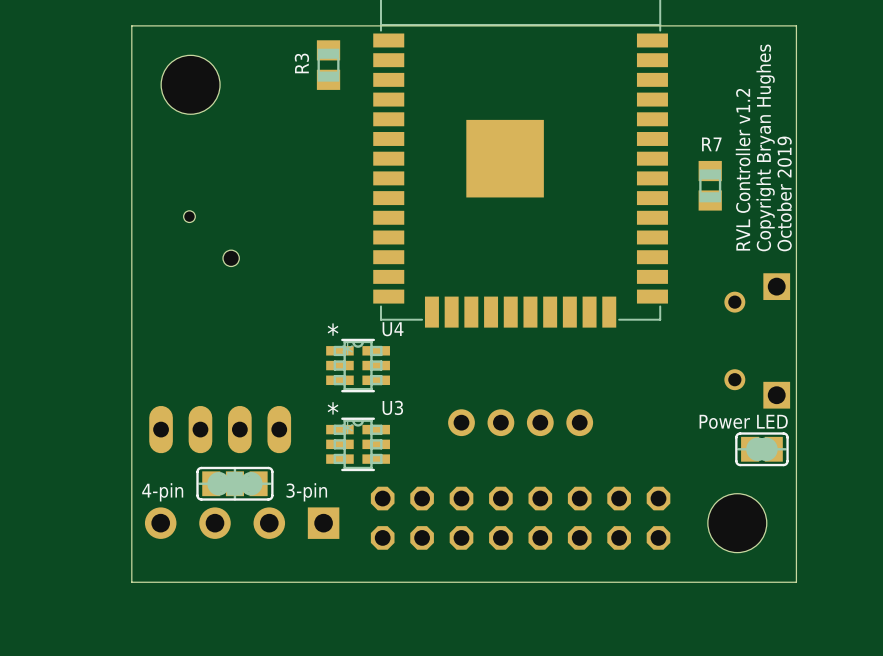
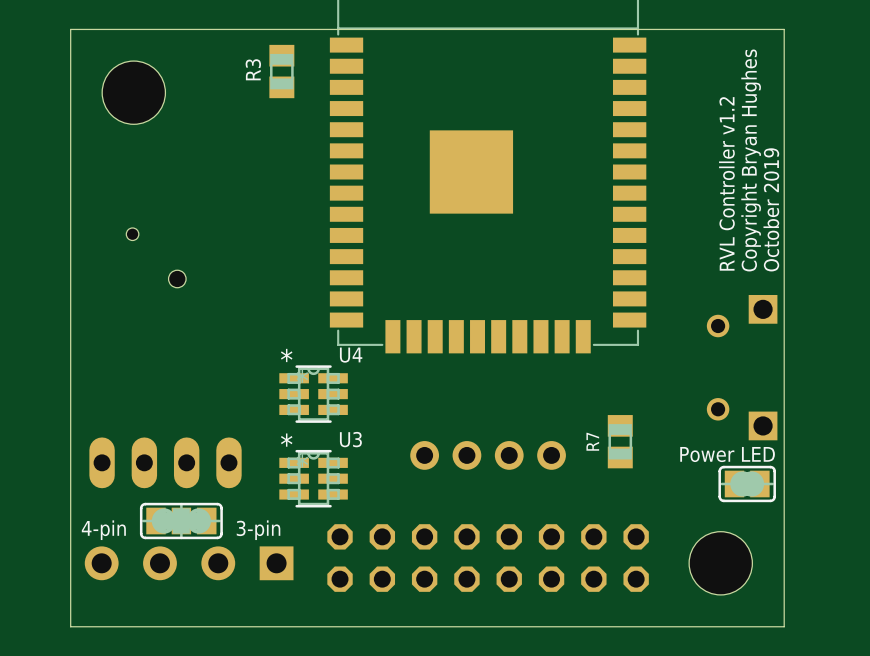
R7 name rotation: 0° (711, 144) -> 90° counterclockwise (592, 441)
R7 name position: R7 (711, 144) -> R7 (592, 441)
R7 position: (710, 185) -> (620, 441)

